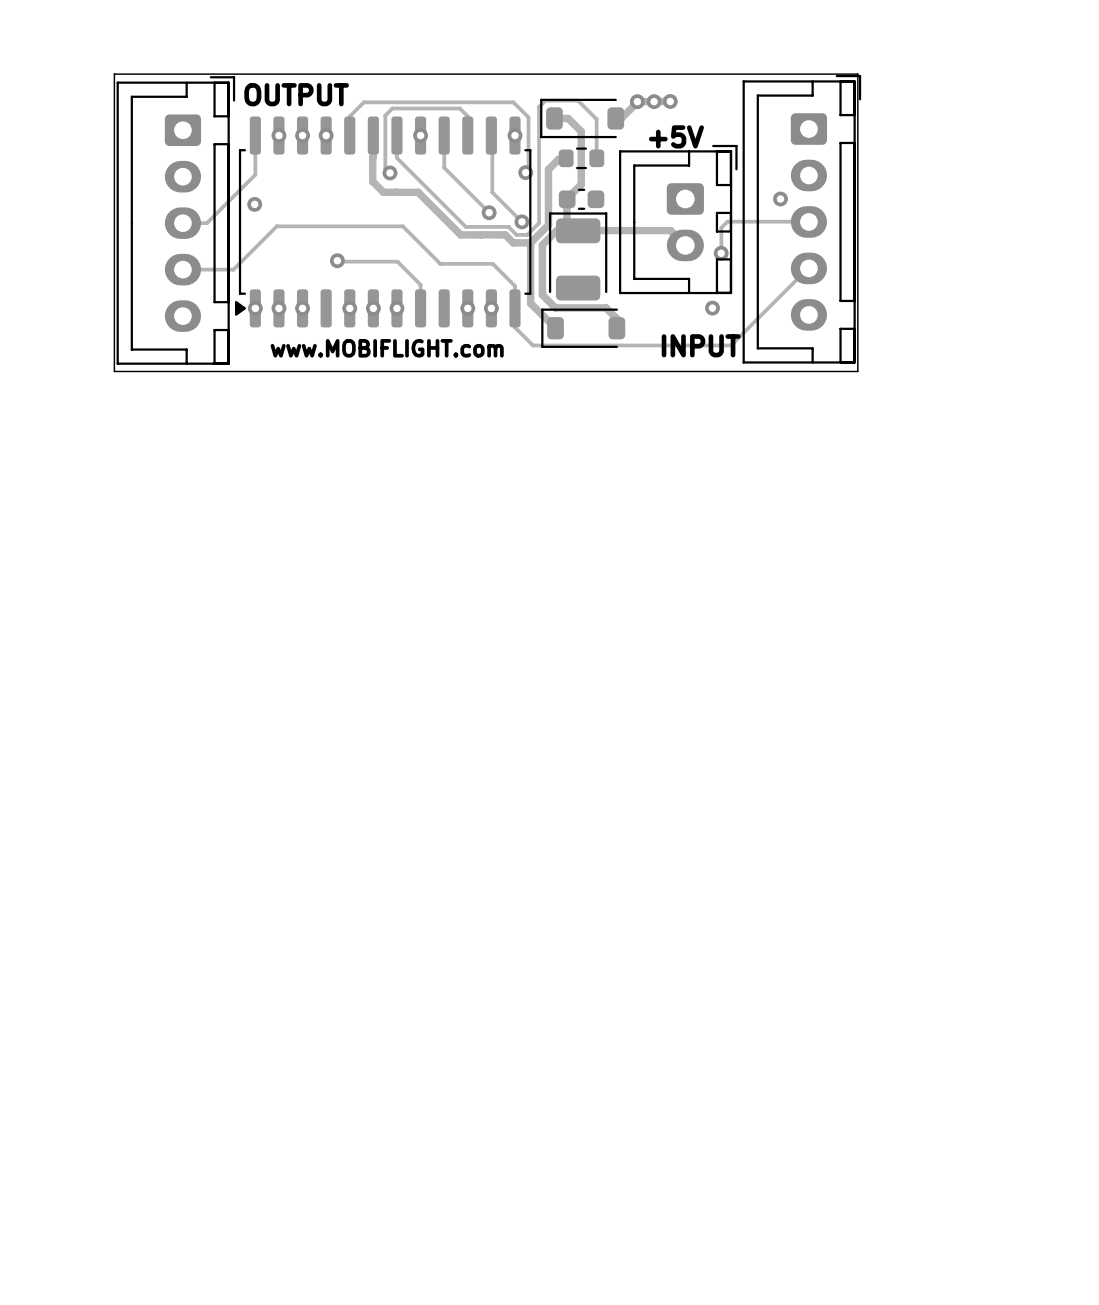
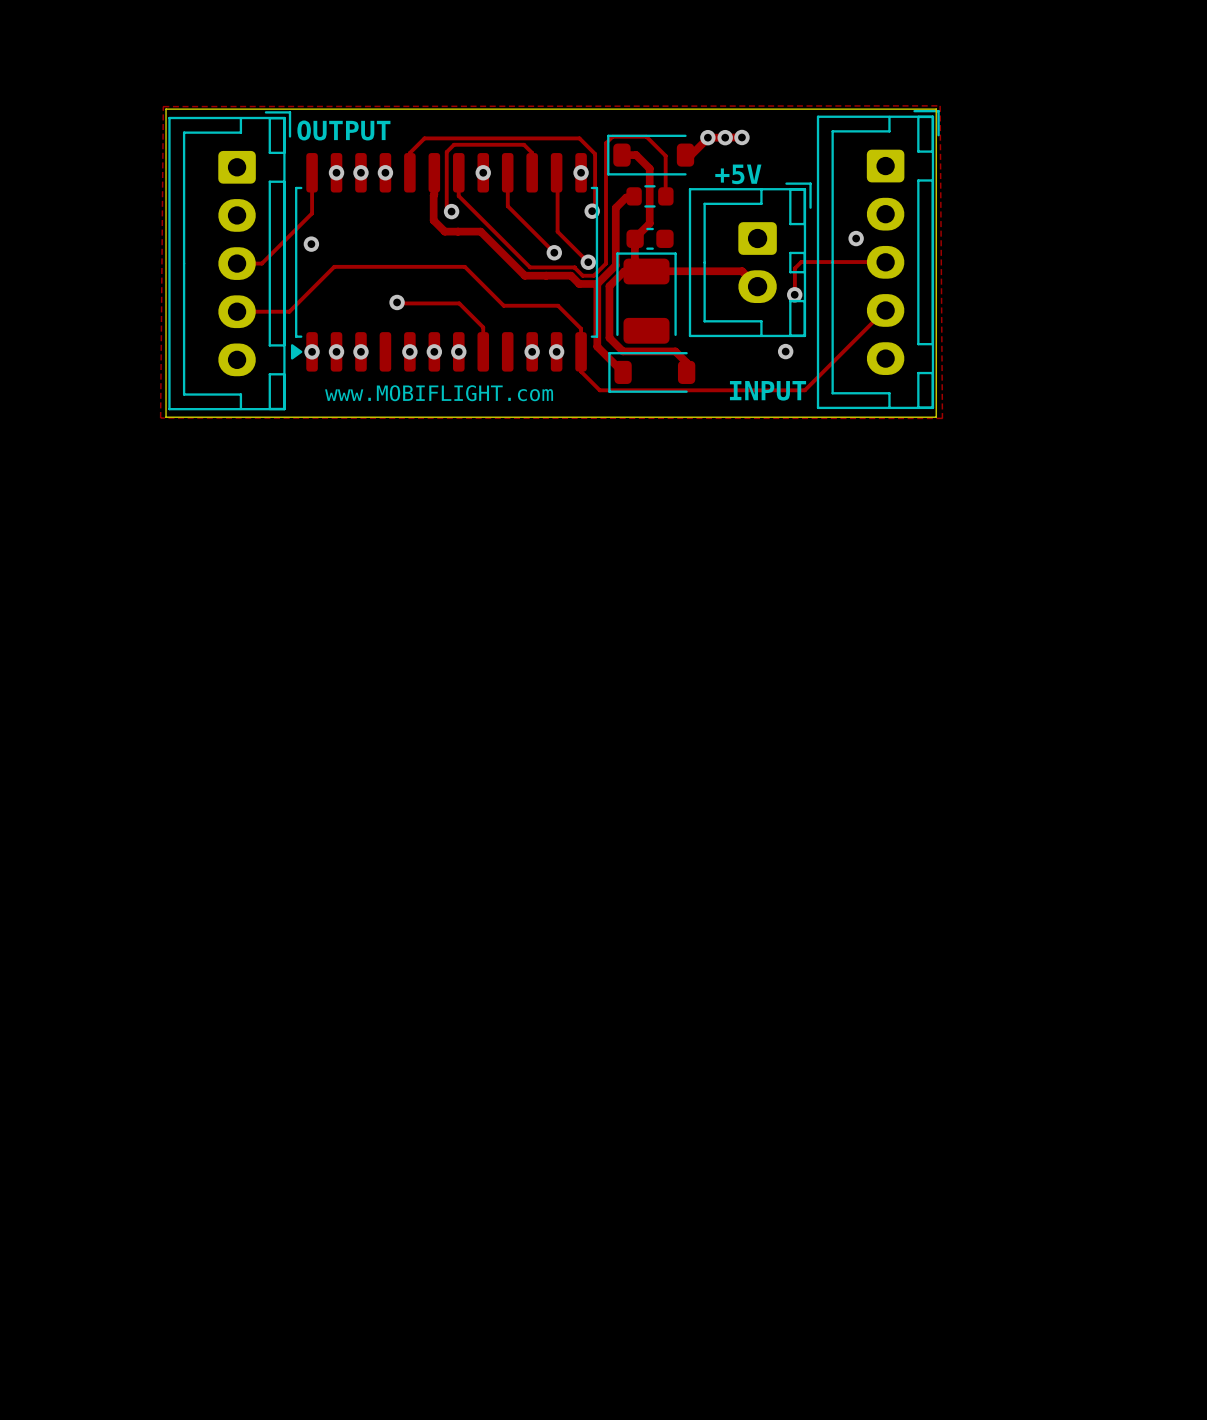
zone outline: none -> (940, 105) (163, 106) (160, 418) (942, 418) (940, 105)

